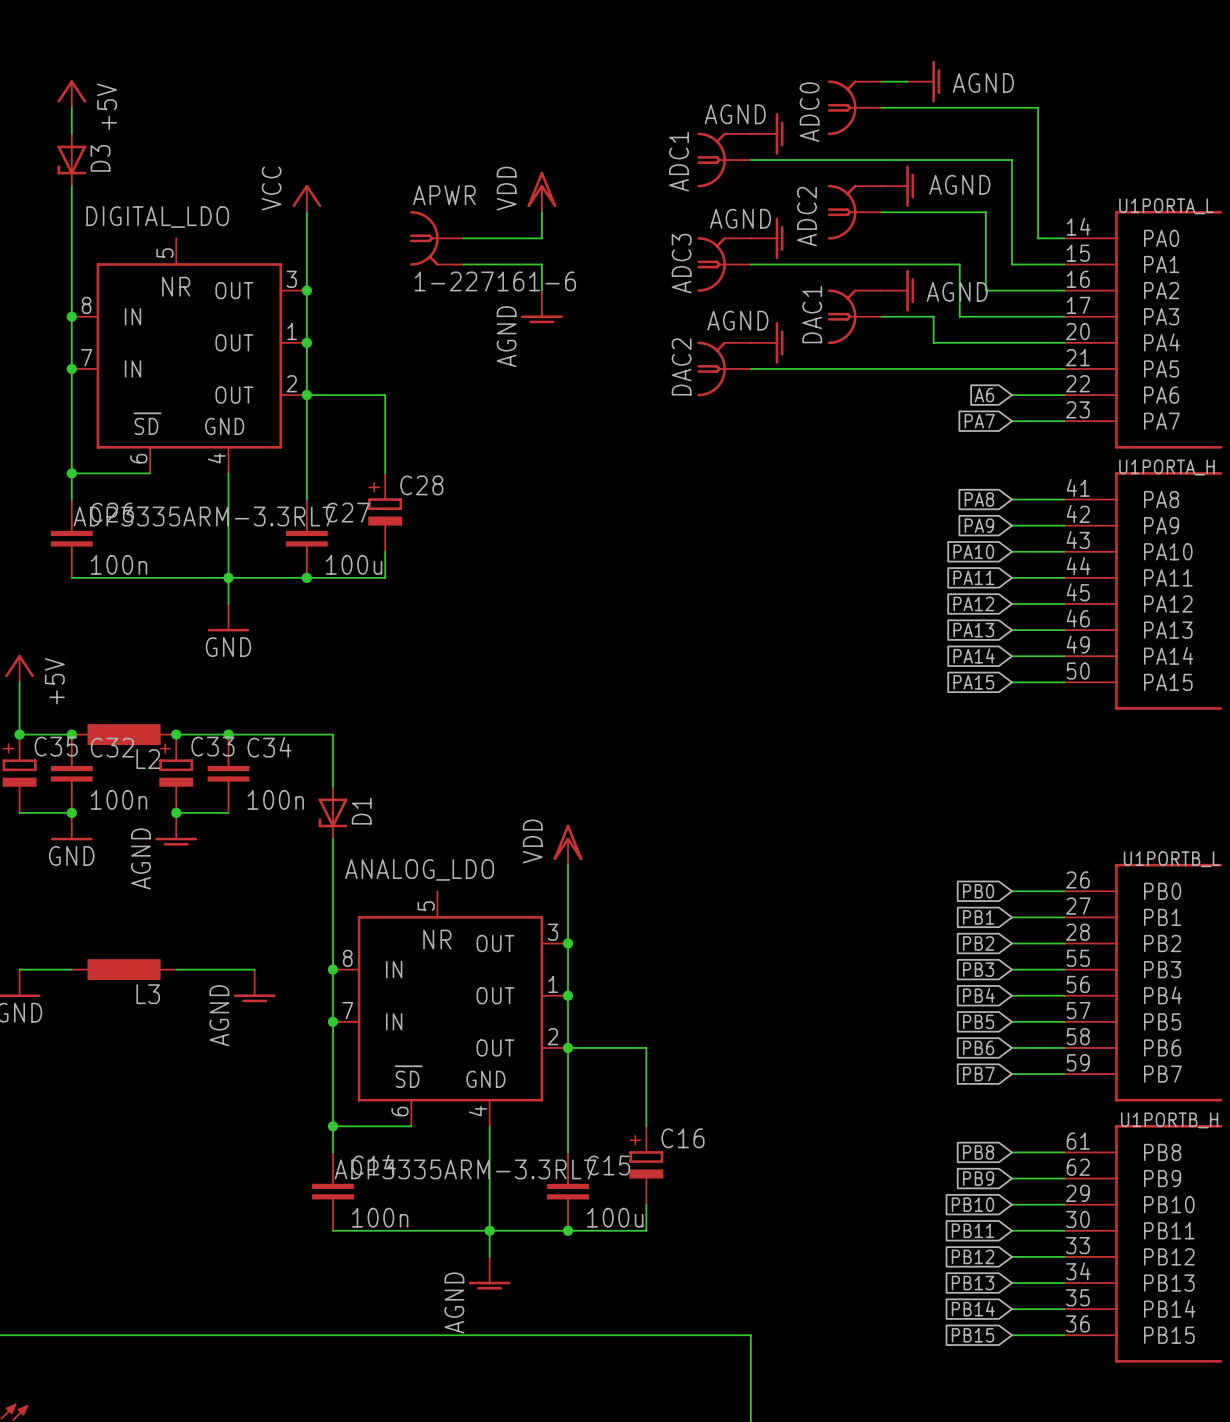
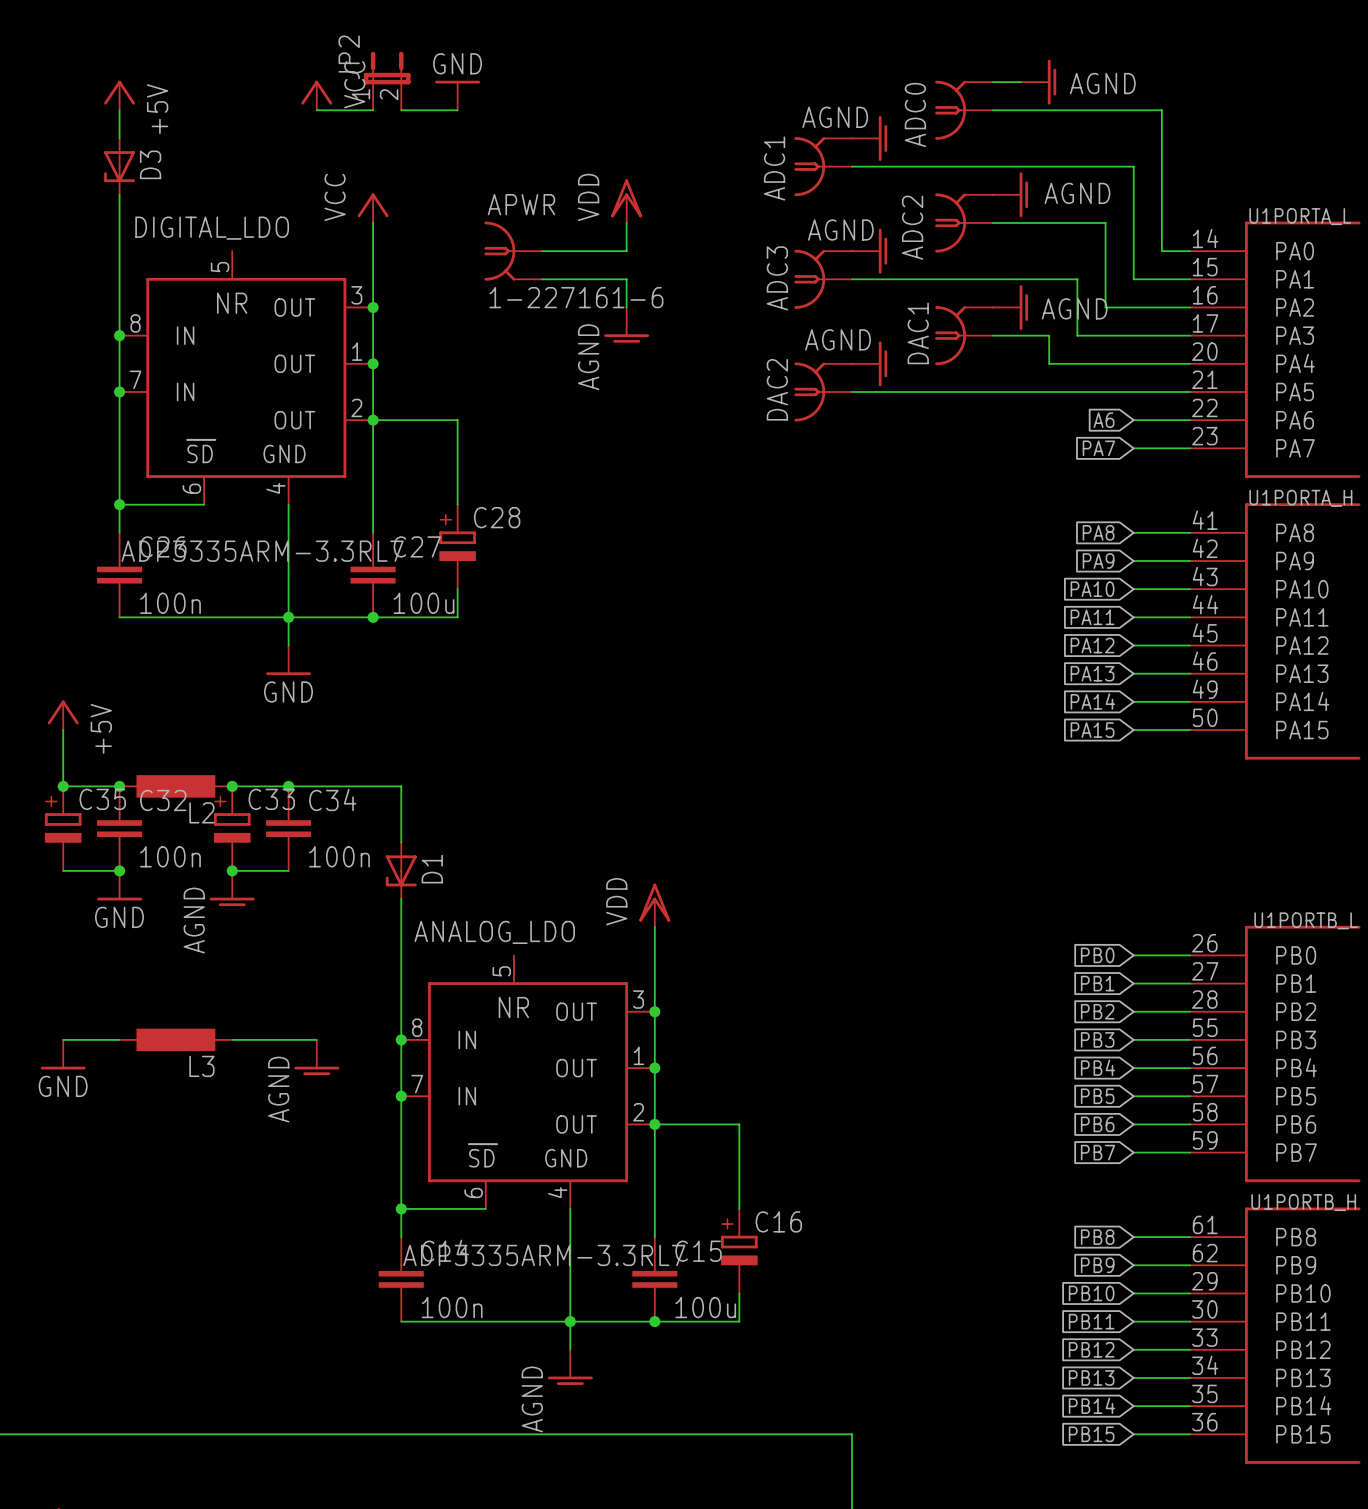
JP2: none -> (387, 80)
power symbol: none -> VCC (316, 95)
power symbol: none -> GND (457, 95)
wire: none -> (316, 110) (373, 110)
wire: none -> (401, 110) (457, 110)

